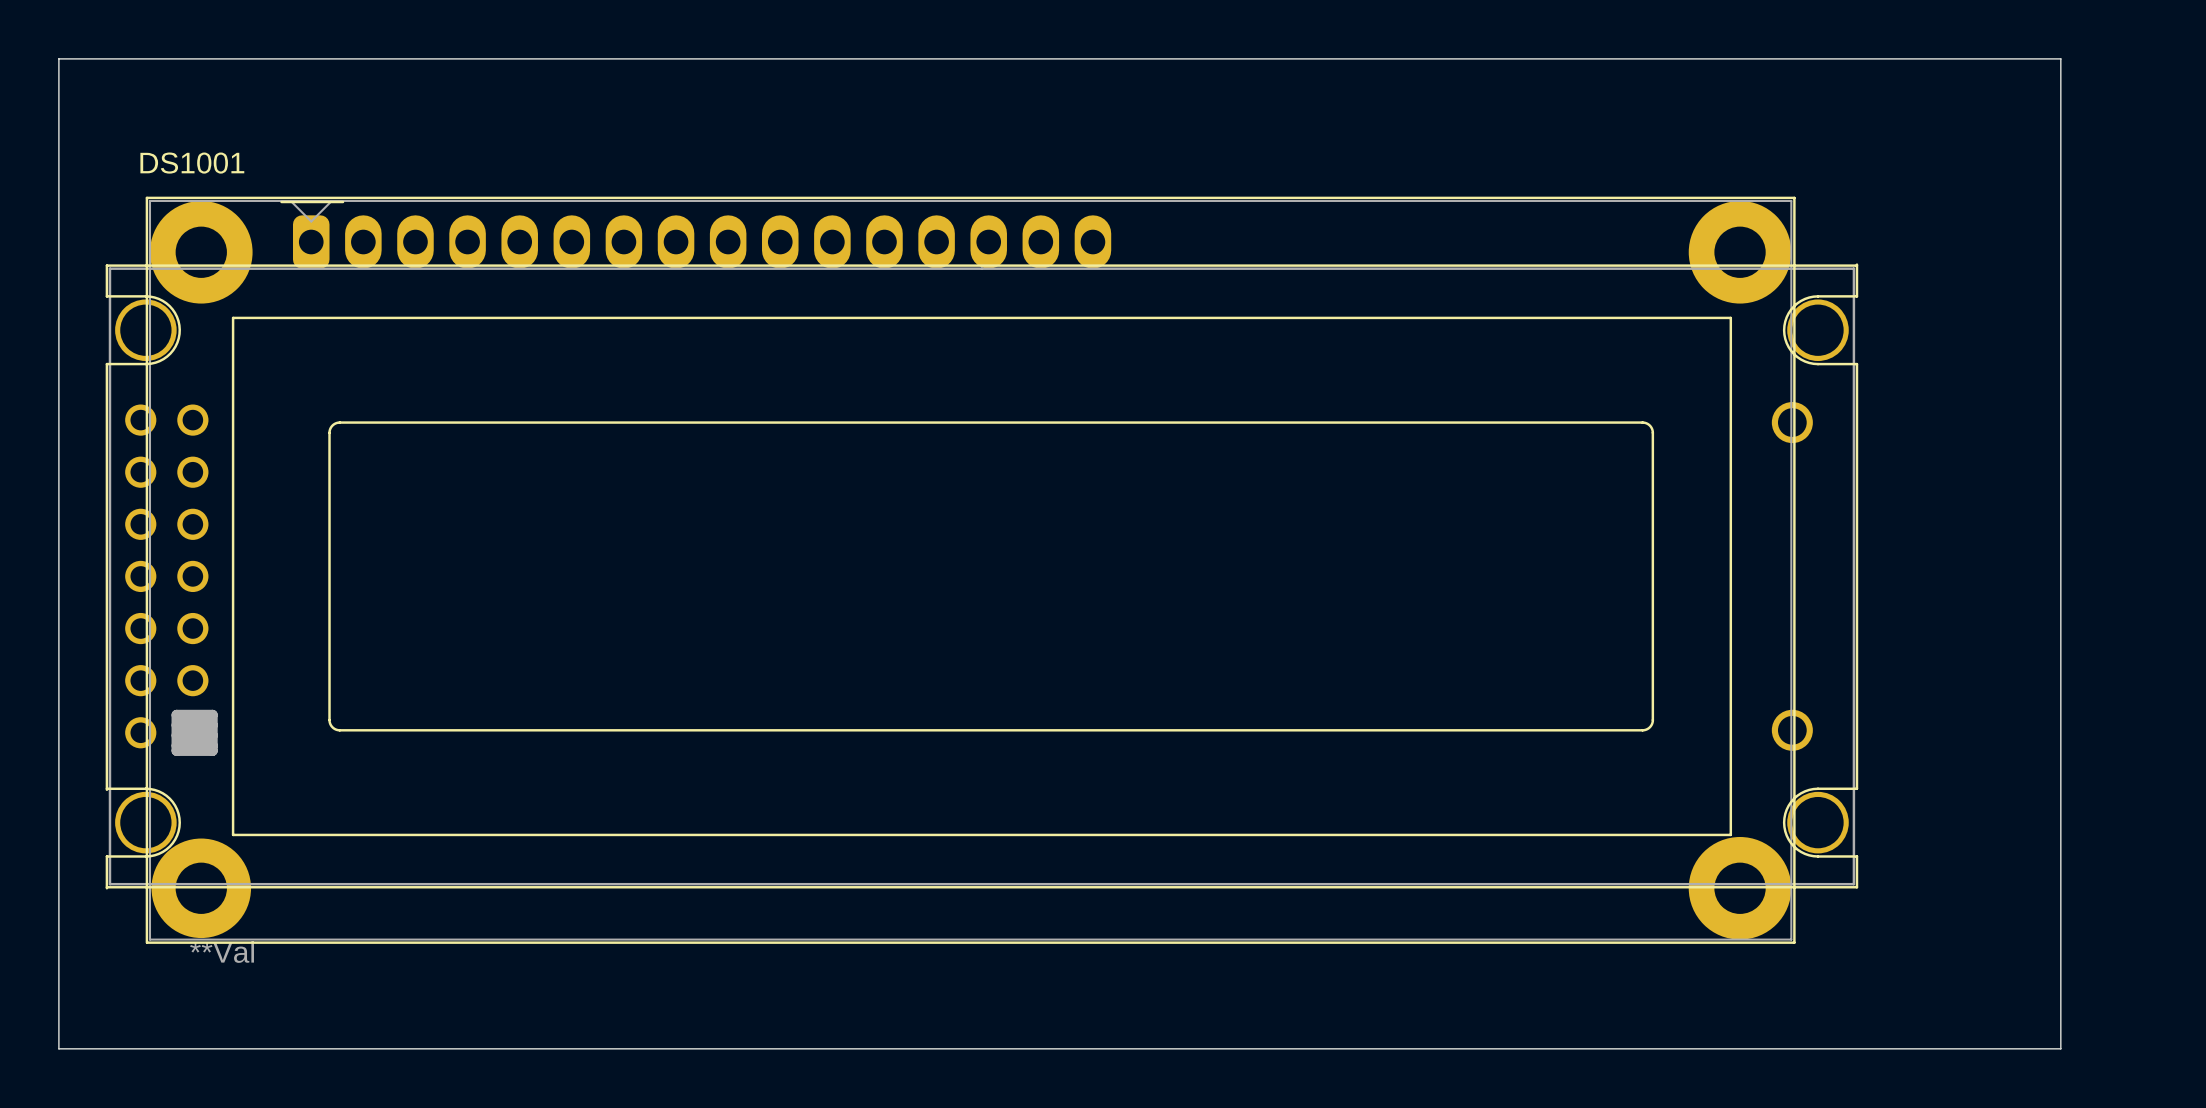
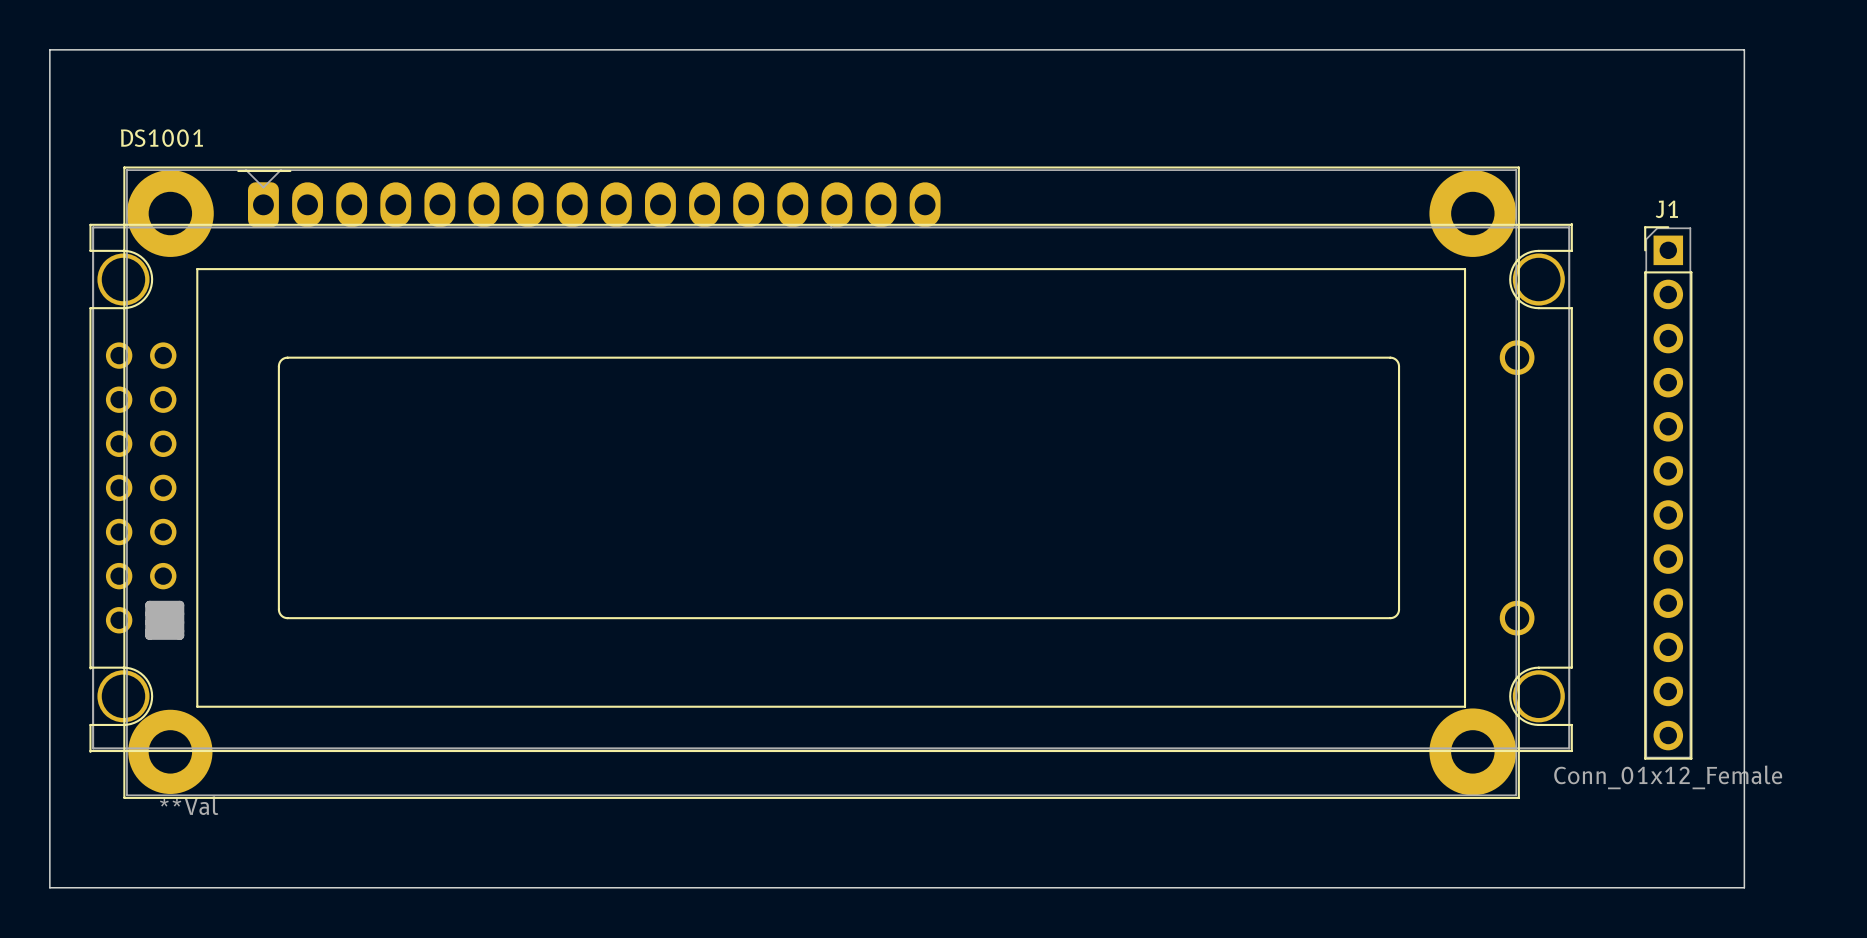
J1: none -> Conn_01x12_Female (1668, 492)

